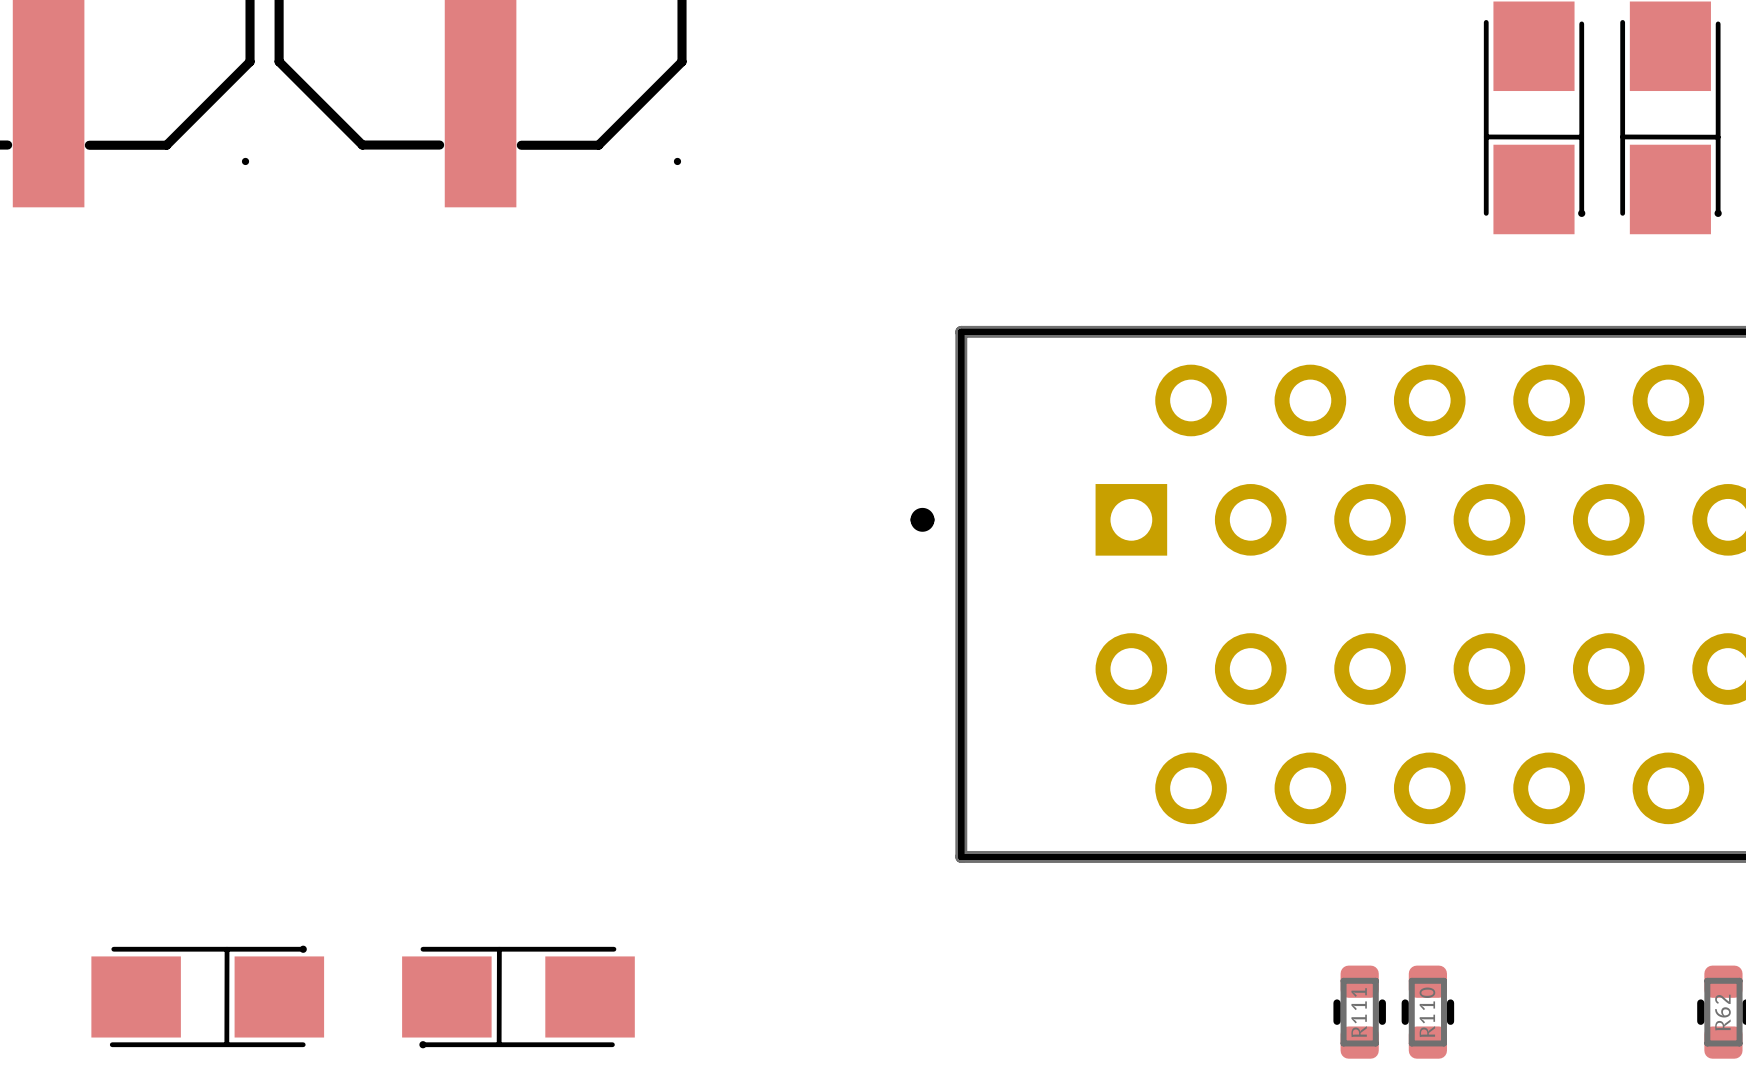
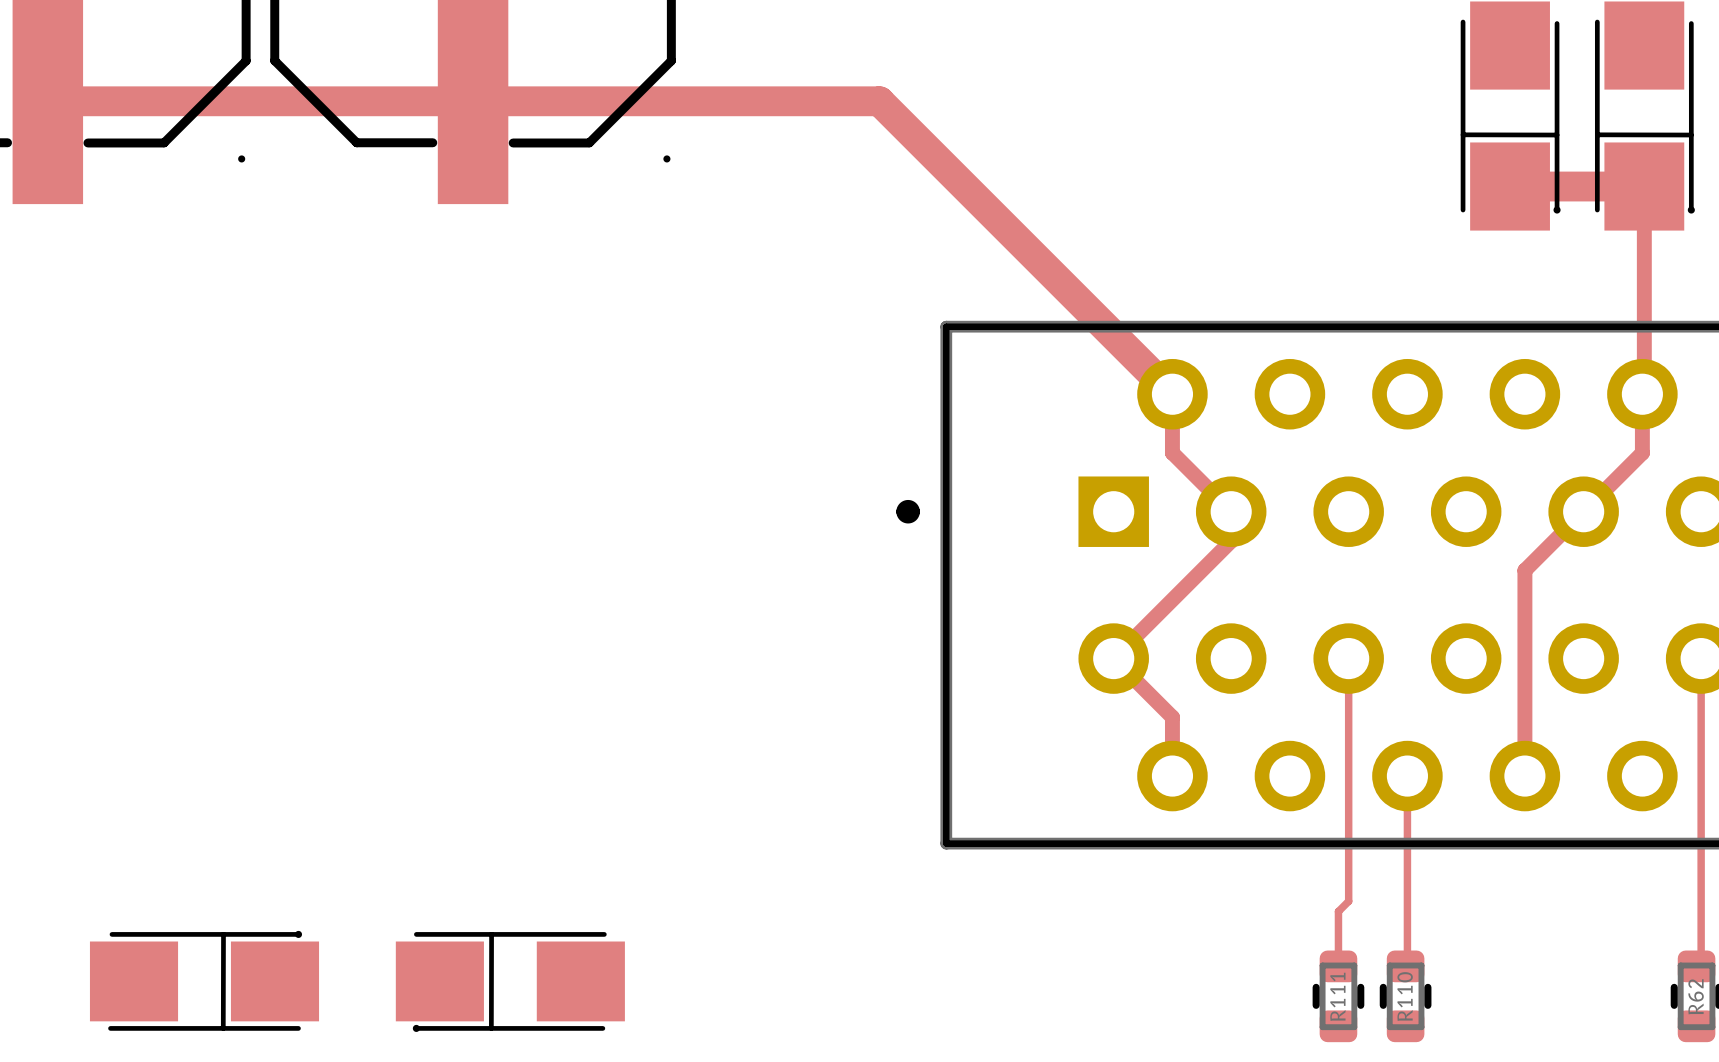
track: none -> (47, 101) (879, 101) (1172, 394) (1172, 452) (1231, 511) (1231, 541) (1113, 658) (1172, 717) (1172, 776)
track: none -> (1510, 186) (1644, 186) (1642, 452) (1524, 570) (1524, 776)
track: none -> (1348, 658) (1348, 901) (1338, 911) (1338, 966)
track: none -> (1701, 658) (1701, 966)
track: none -> (1407, 776) (1407, 964) (1405, 966)

